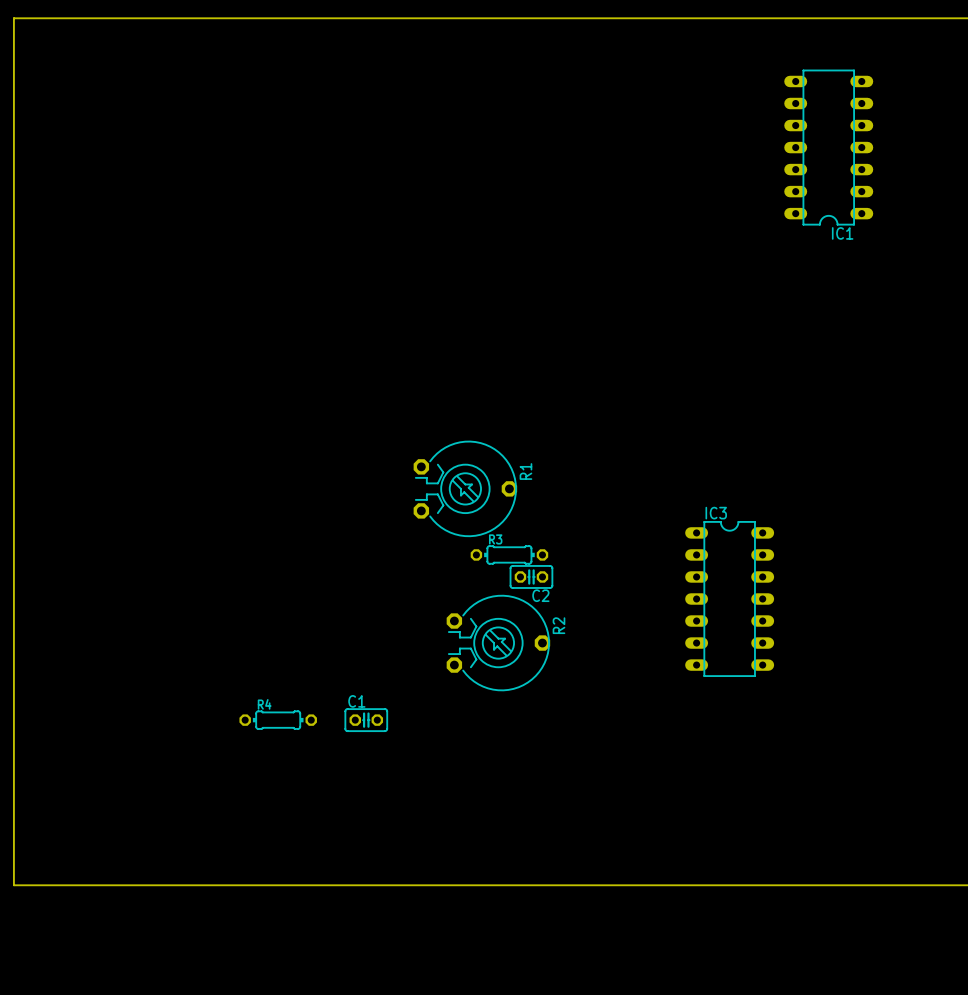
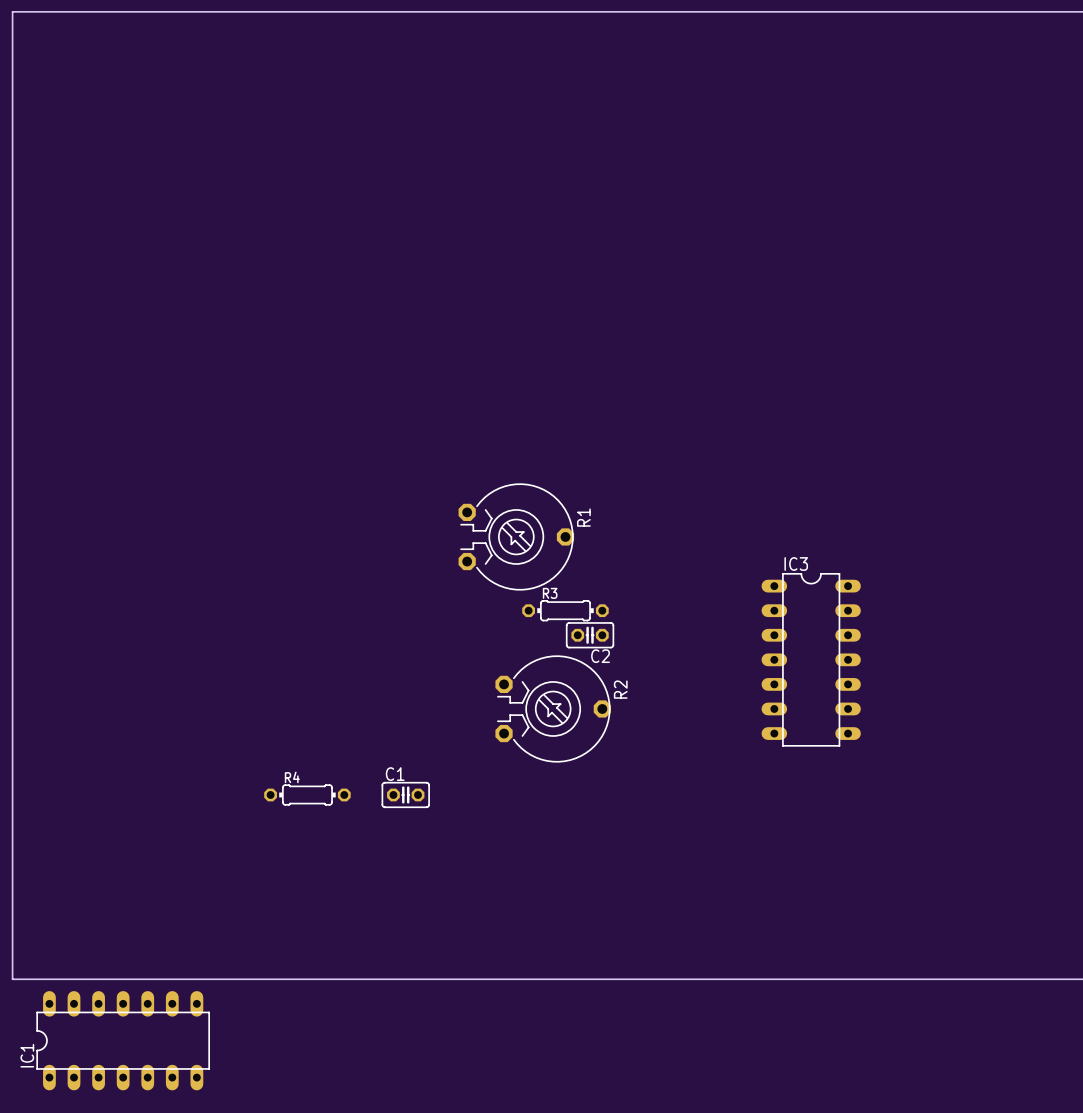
IC1 rotation: 0° (828, 147) -> 90° clockwise (123, 1040)
IC1 position: (828, 147) -> (123, 1040)

